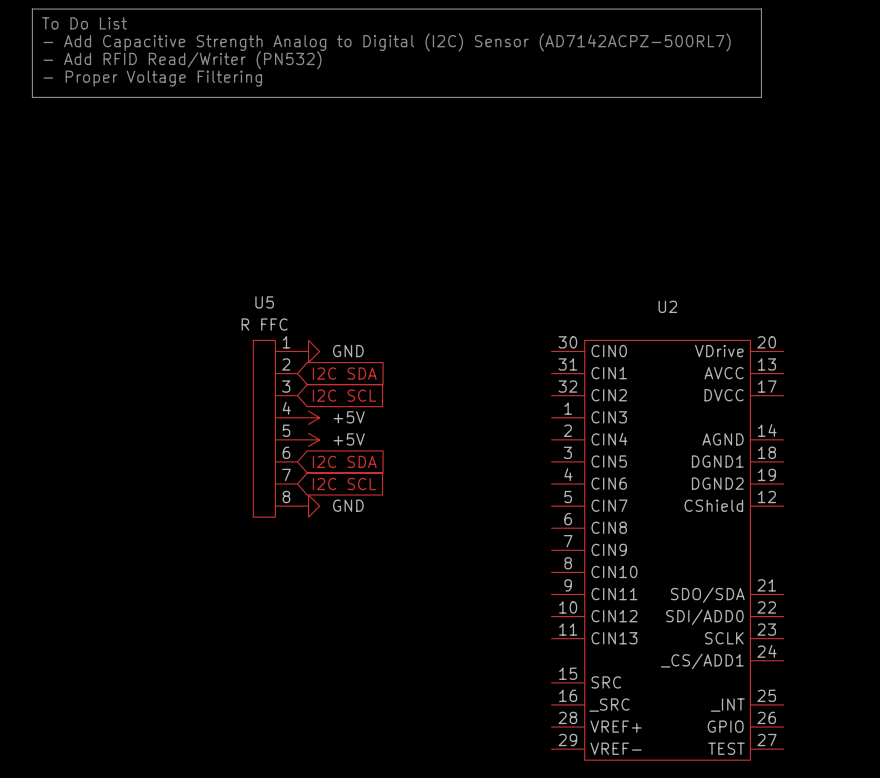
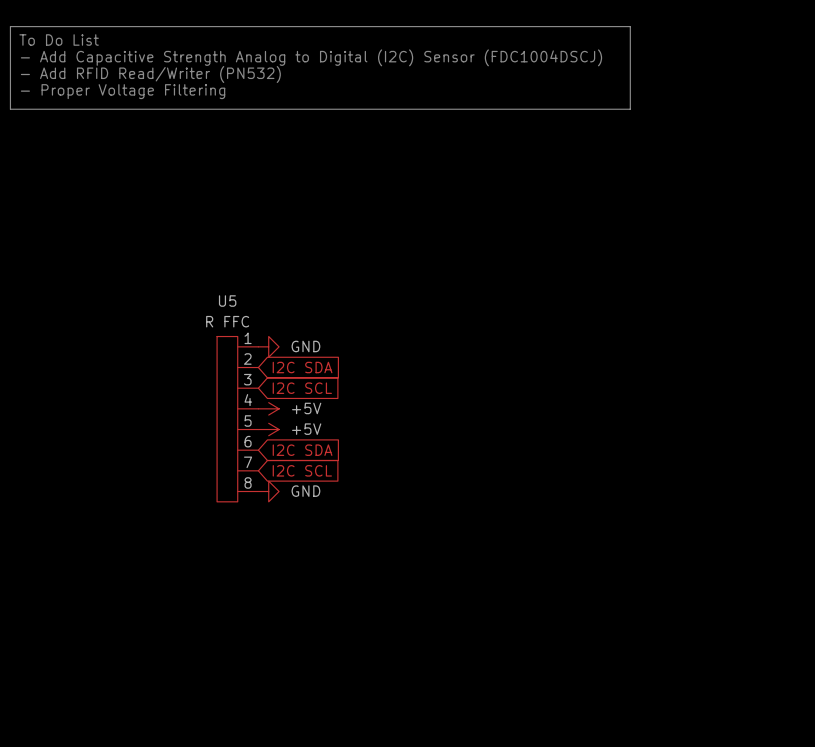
line: (695, 9) (761, 9) (761, 97) (695, 97) -> (630, 26) (630, 109)
text: - Add Capacitive Strength Analog to Digital (I2C) Sensor (AD7142ACPZ-500RL7) (387, 42) -> - Add Capacitive Strength Analog to Digital (I2C) Sensor (FDC1004DSCJ) (311, 57)
U2: (667, 550) -> none

